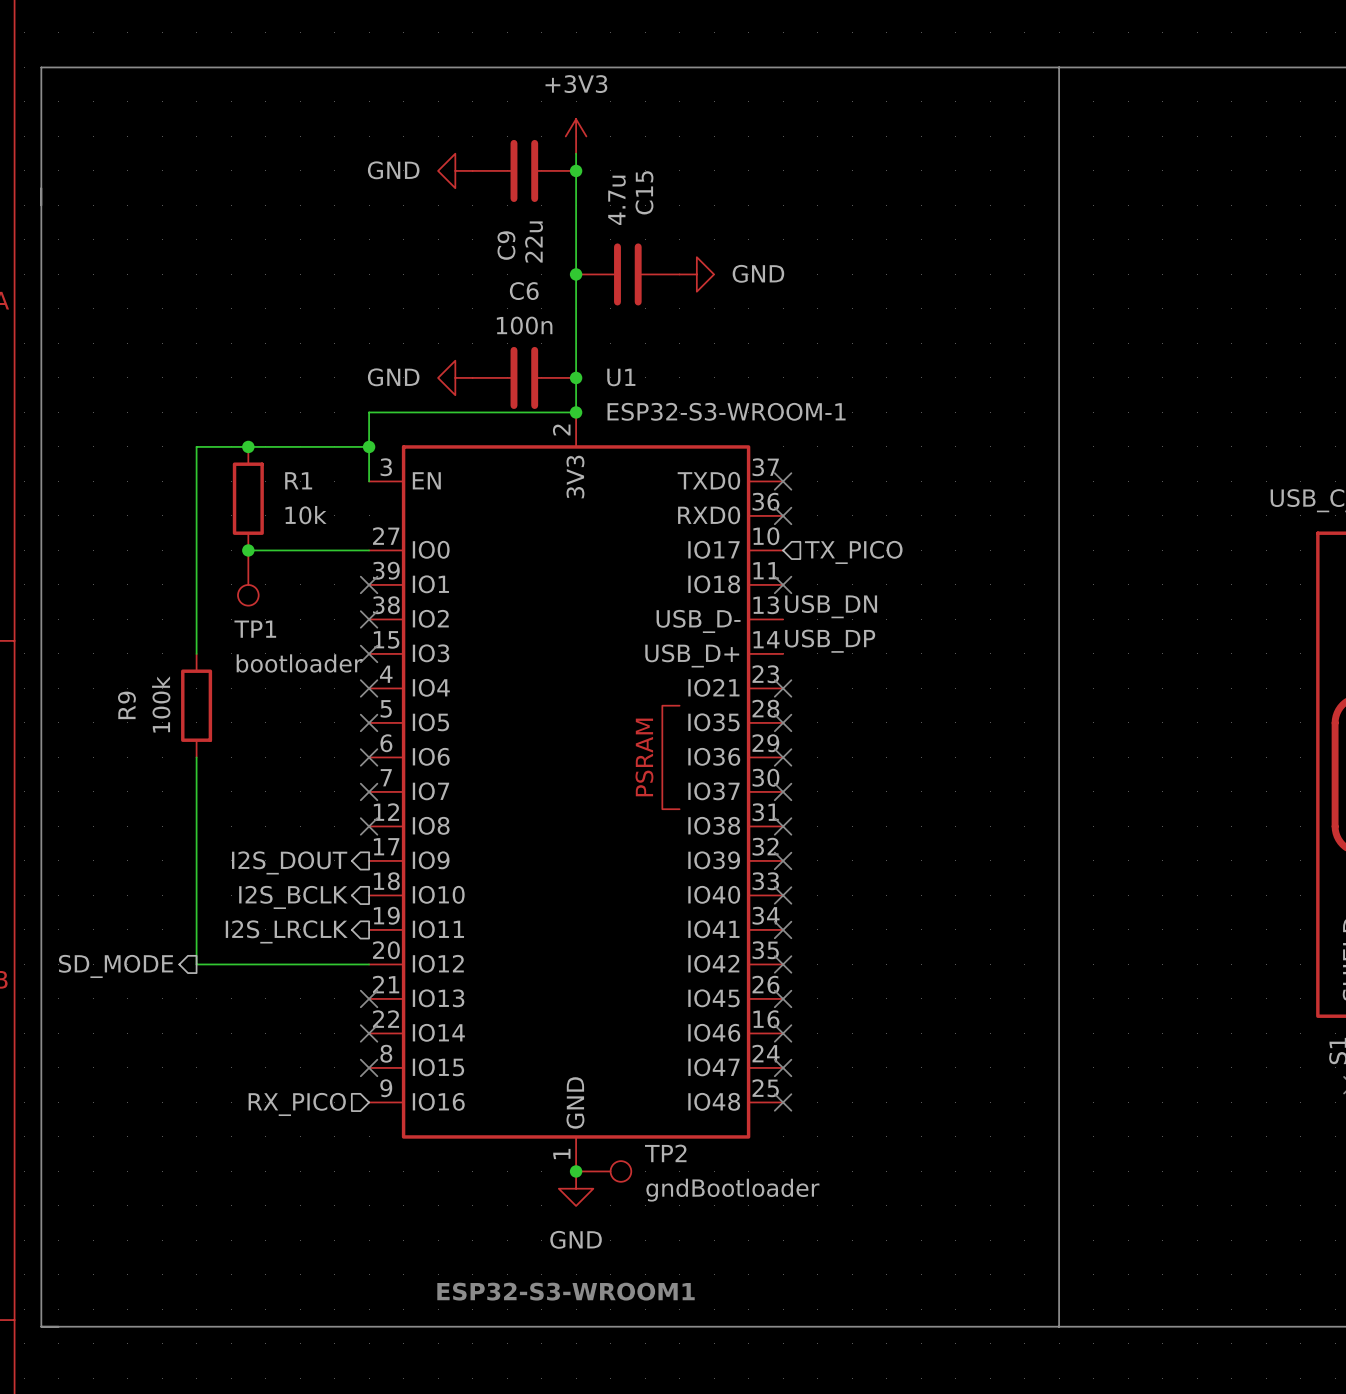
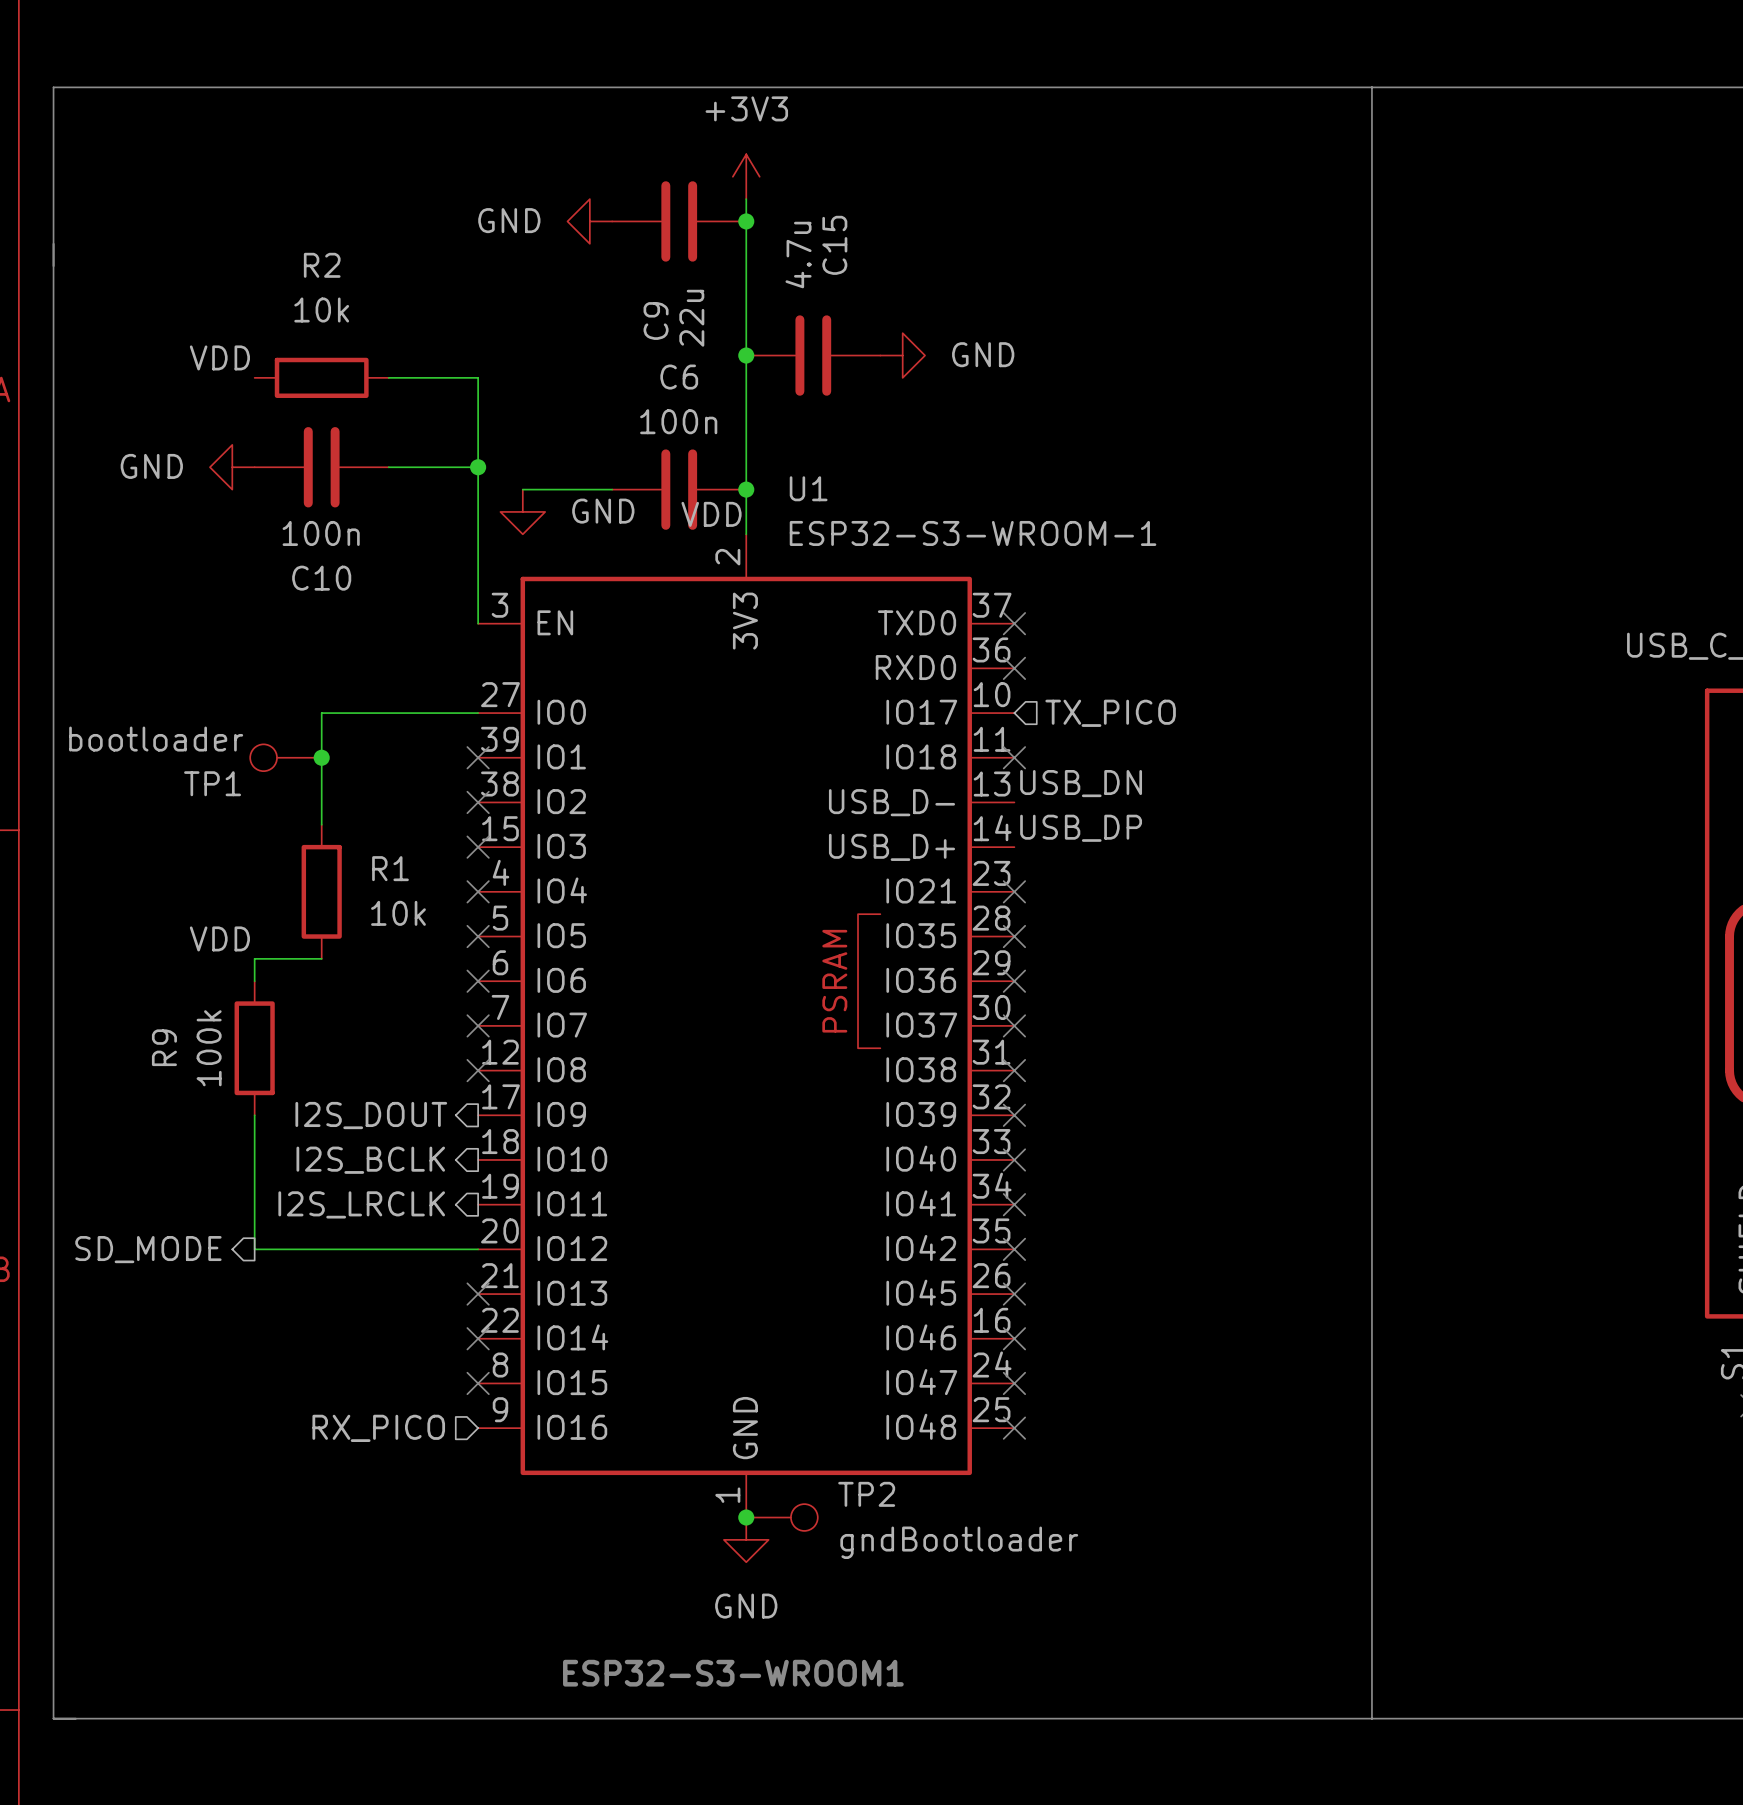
label: none -> VDD (219, 357)
R2: none -> 10k (321, 377)
power symbol: none -> GND (232, 467)
C10: none -> 100n (321, 467)
wire: none -> (388, 467) (478, 467)
junction: none -> (478, 467)
power symbol text position: GND (393, 377) -> GND (603, 511)
wire: none -> (522, 489) (612, 489)
power symbol rotation: 0° (455, 377) -> 90° counterclockwise (522, 511)
power symbol position: GND (455, 377) -> GND (522, 511)
label: none -> VDD (711, 514)
wire: (369, 412) (576, 412) -> (478, 534) (478, 377) (388, 377)
junction: (576, 412) -> none
junction: (248, 446) -> none
wire: (369, 446) (196, 446) (196, 653) -> none
junction: (369, 446) -> none
R1 position: (248, 498) -> (321, 891)
wire: none -> (321, 713) (321, 824)
junction position: (248, 550) -> (321, 757)
TP1 rotation: 0° (248, 595) -> 90° clockwise (263, 757)
TP1 value position: bootloader (299, 663) -> bootloader (156, 739)
R9 position: (196, 705) -> (254, 1048)
label: none -> VDD (219, 938)
wire: (196, 757) (196, 860) -> (254, 981) (254, 958) (321, 958)

